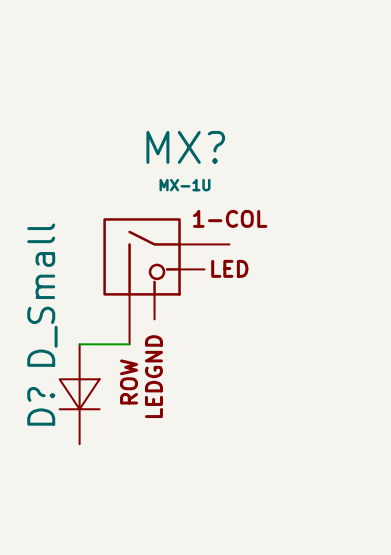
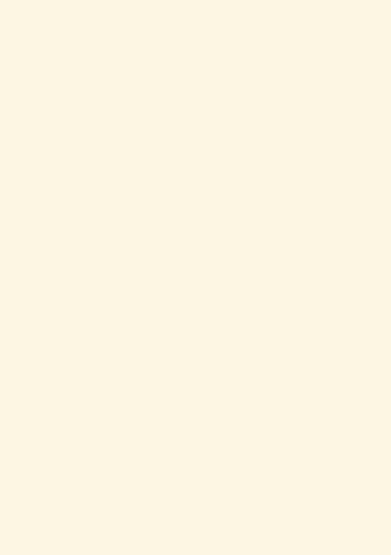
MX?: MX-1U (166, 281) -> none
wire: (79, 344) (129, 344) -> none
D?: D_Small (79, 394) -> none

